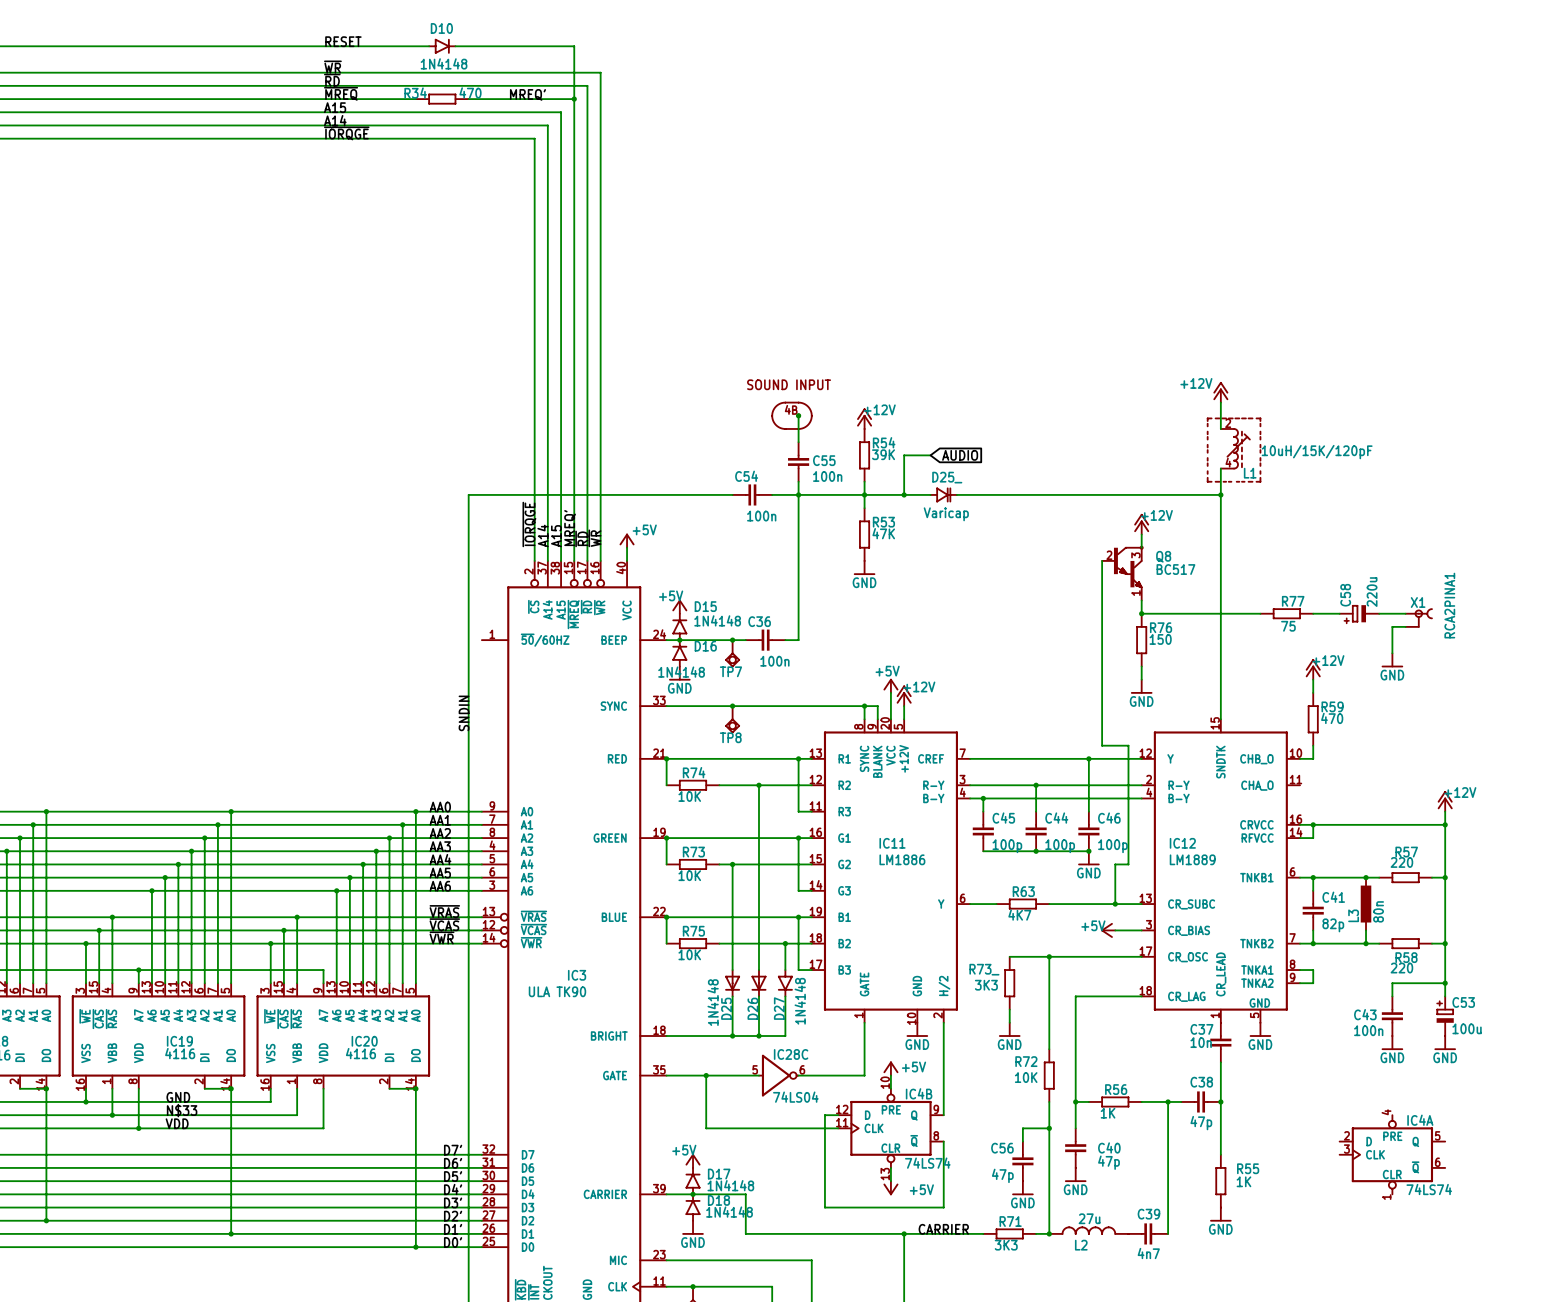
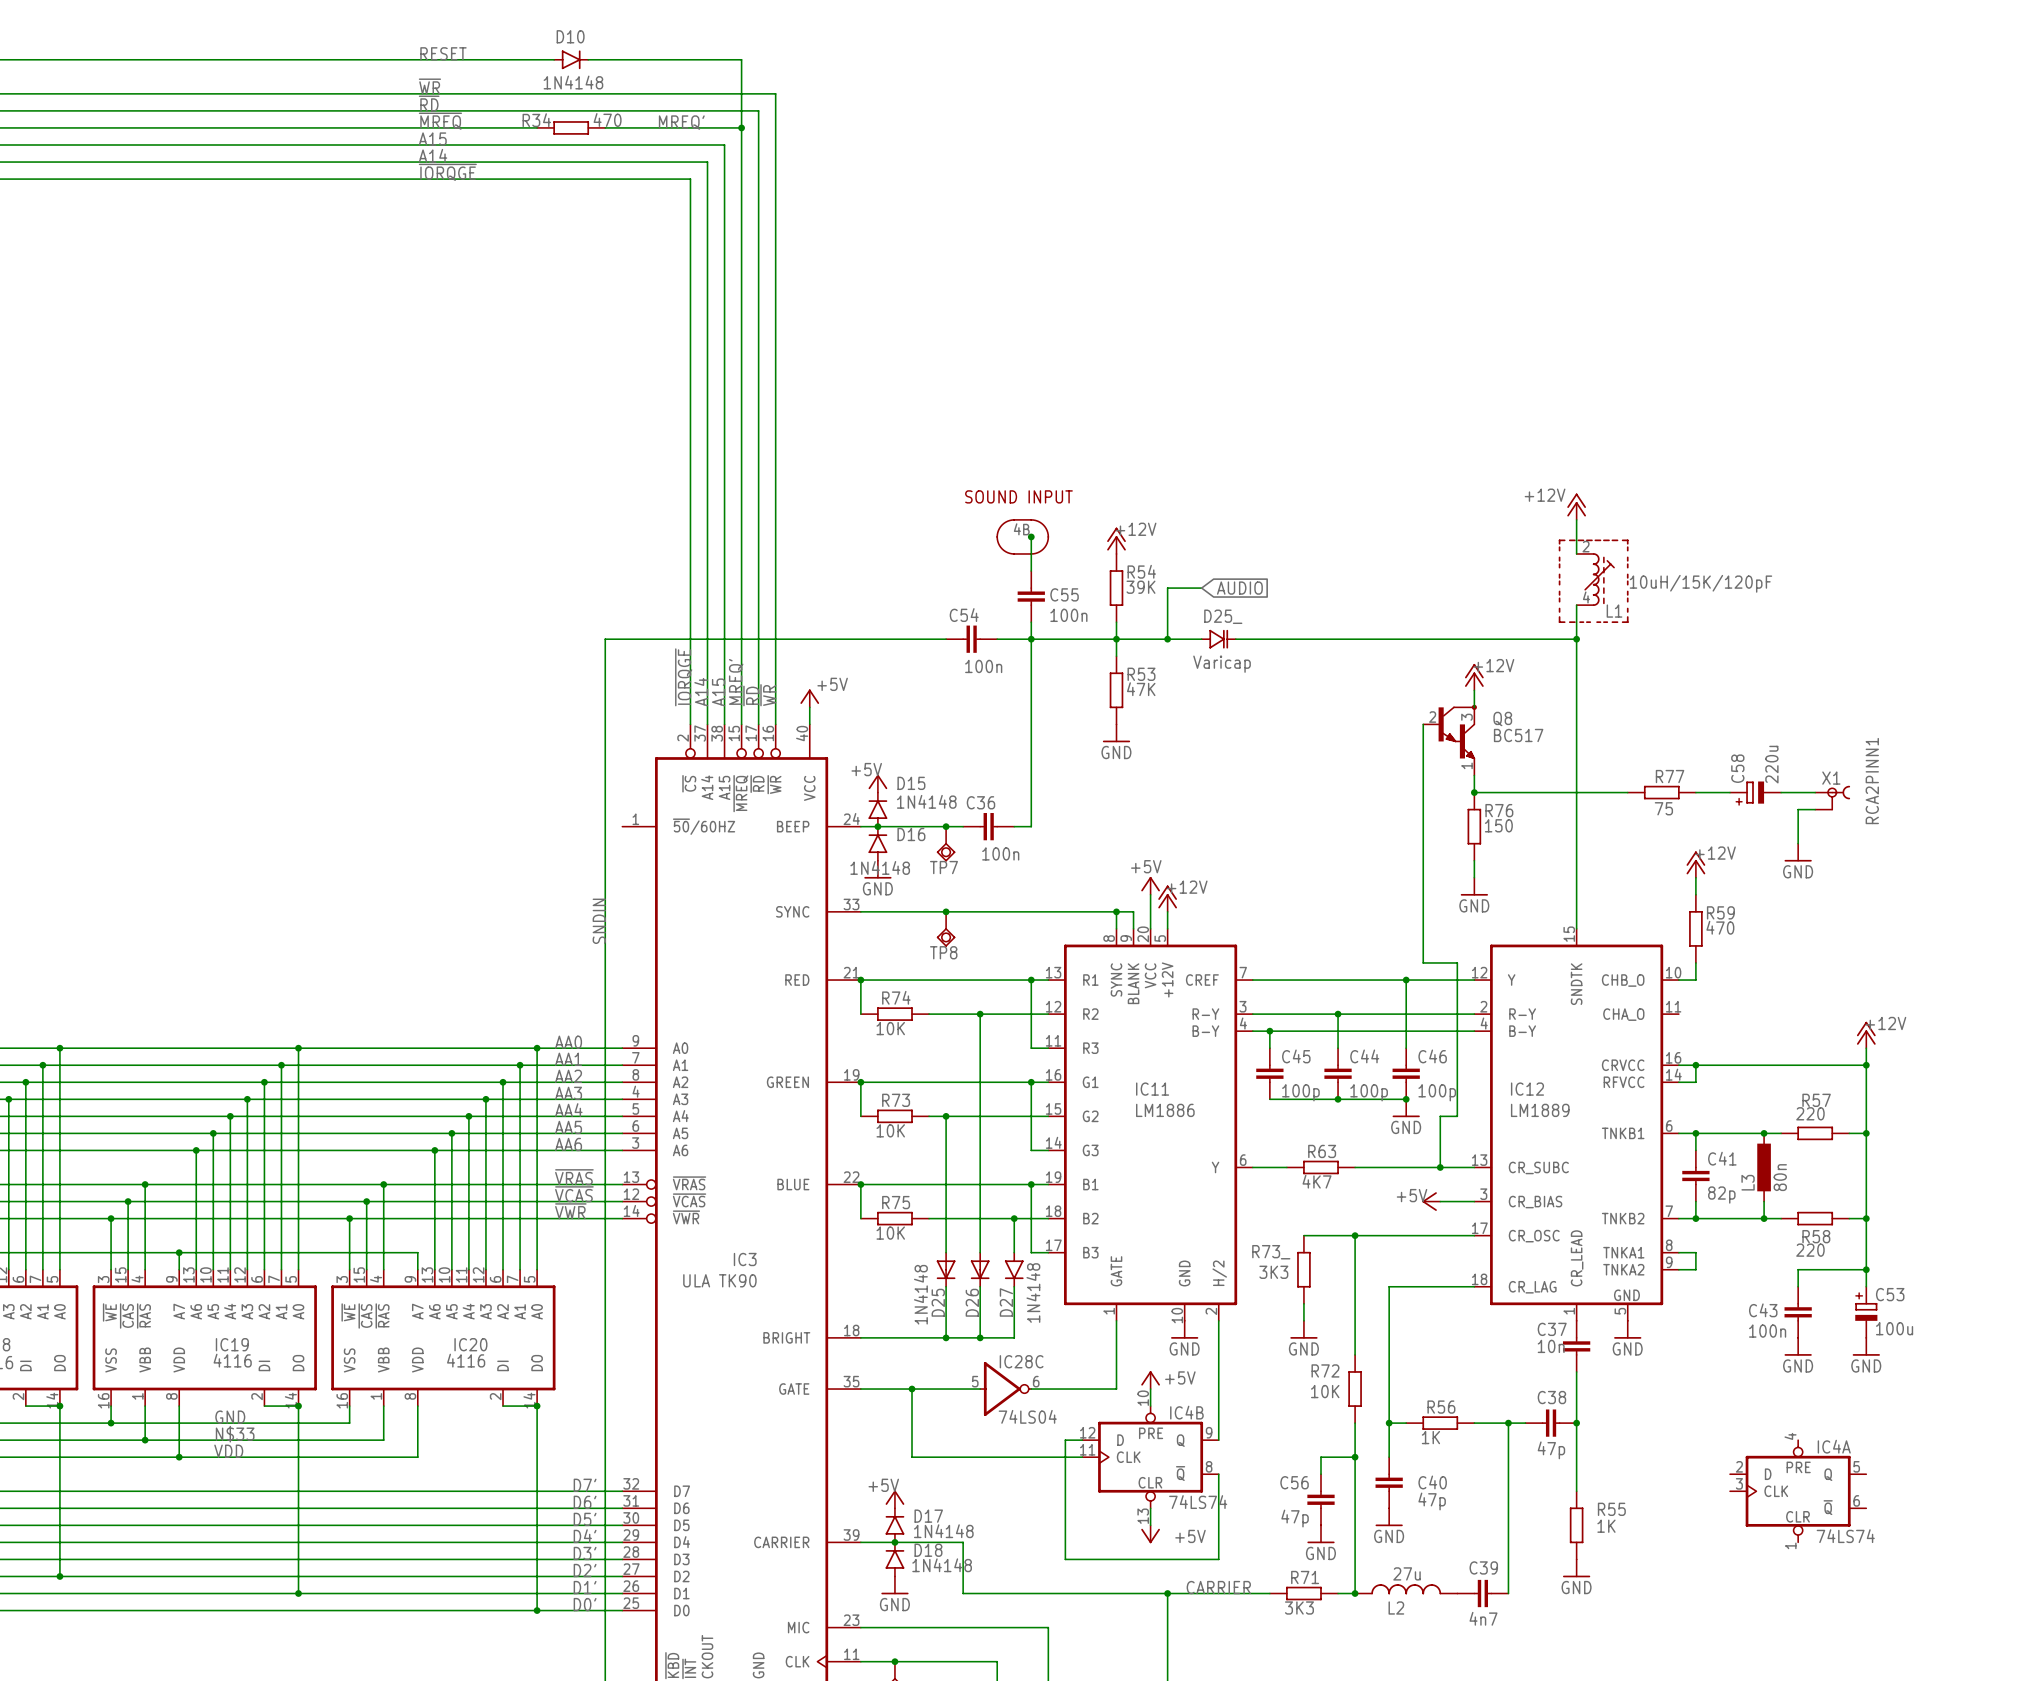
X1 value: RCA2PINA1 (1449, 605) -> RCA2PINN1 (1872, 781)

